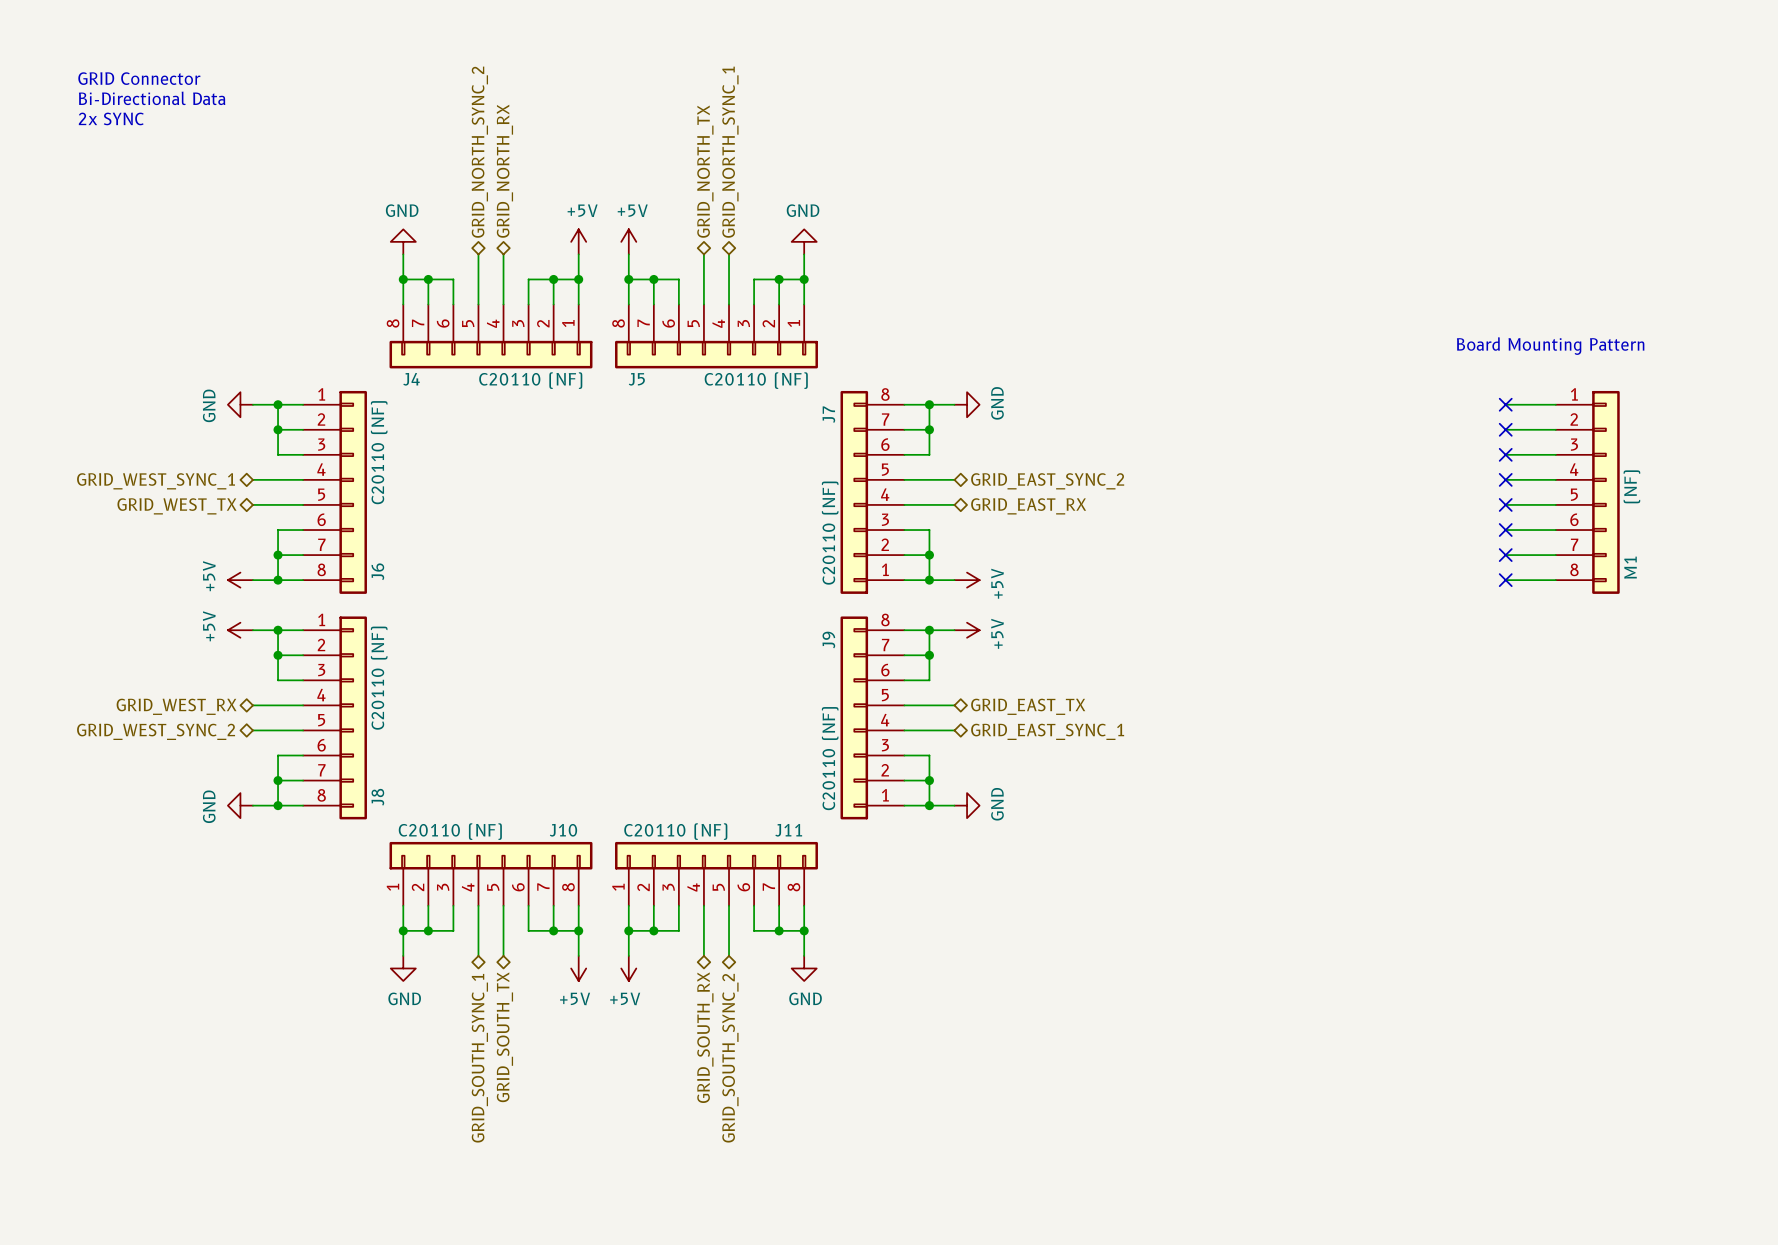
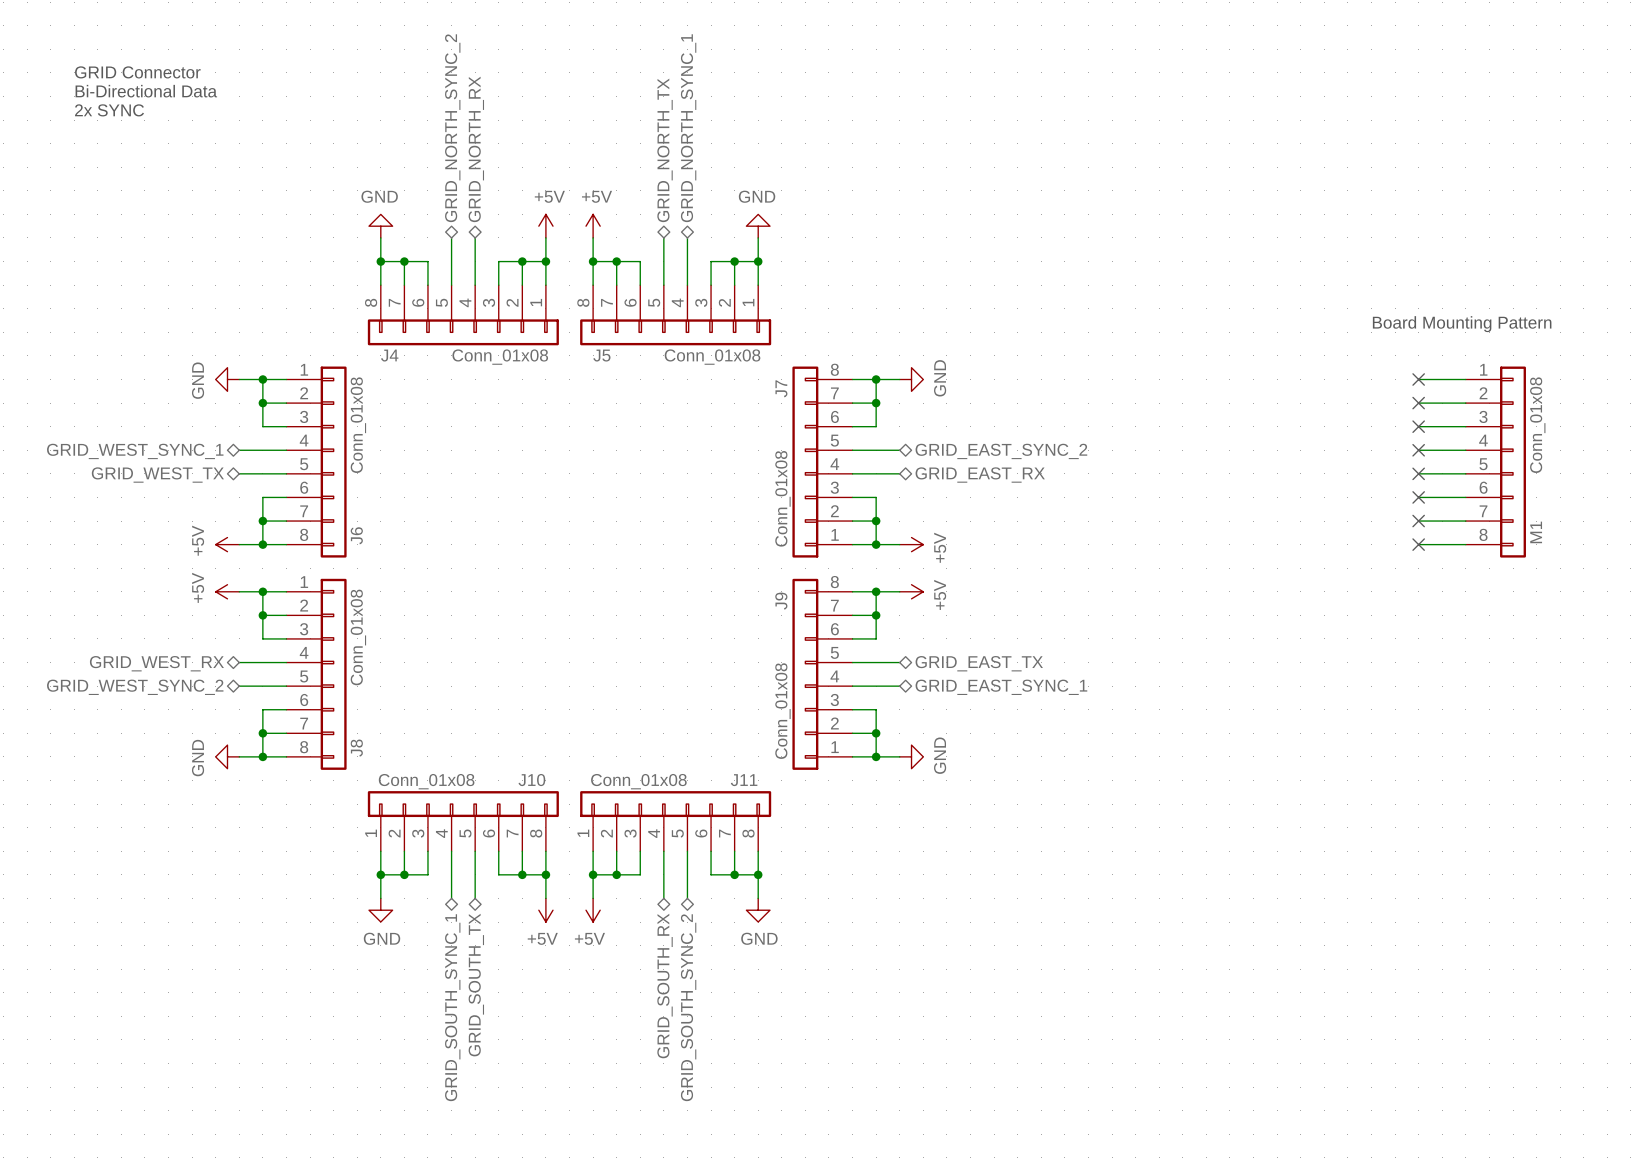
J4 value: C20110 (NF) (530, 380) -> Conn_01x08 (500, 357)
J5 value: C20110 (NF) (756, 380) -> Conn_01x08 (712, 357)
J6 value: C20110 (NF) (379, 452) -> Conn_01x08 (358, 425)
M1 value: (NF) (1631, 486) -> Conn_01x08 (1537, 425)
J7 value: C20110 (NF) (830, 533) -> Conn_01x08 (782, 498)
J8 value: C20110 (NF) (379, 678) -> Conn_01x08 (358, 637)
J9 value: C20110 (NF) (830, 758) -> Conn_01x08 (782, 711)
J10 value: C20110 (NF) (450, 831) -> Conn_01x08 (426, 781)
J11 value: C20110 (NF) (675, 831) -> Conn_01x08 (638, 781)

